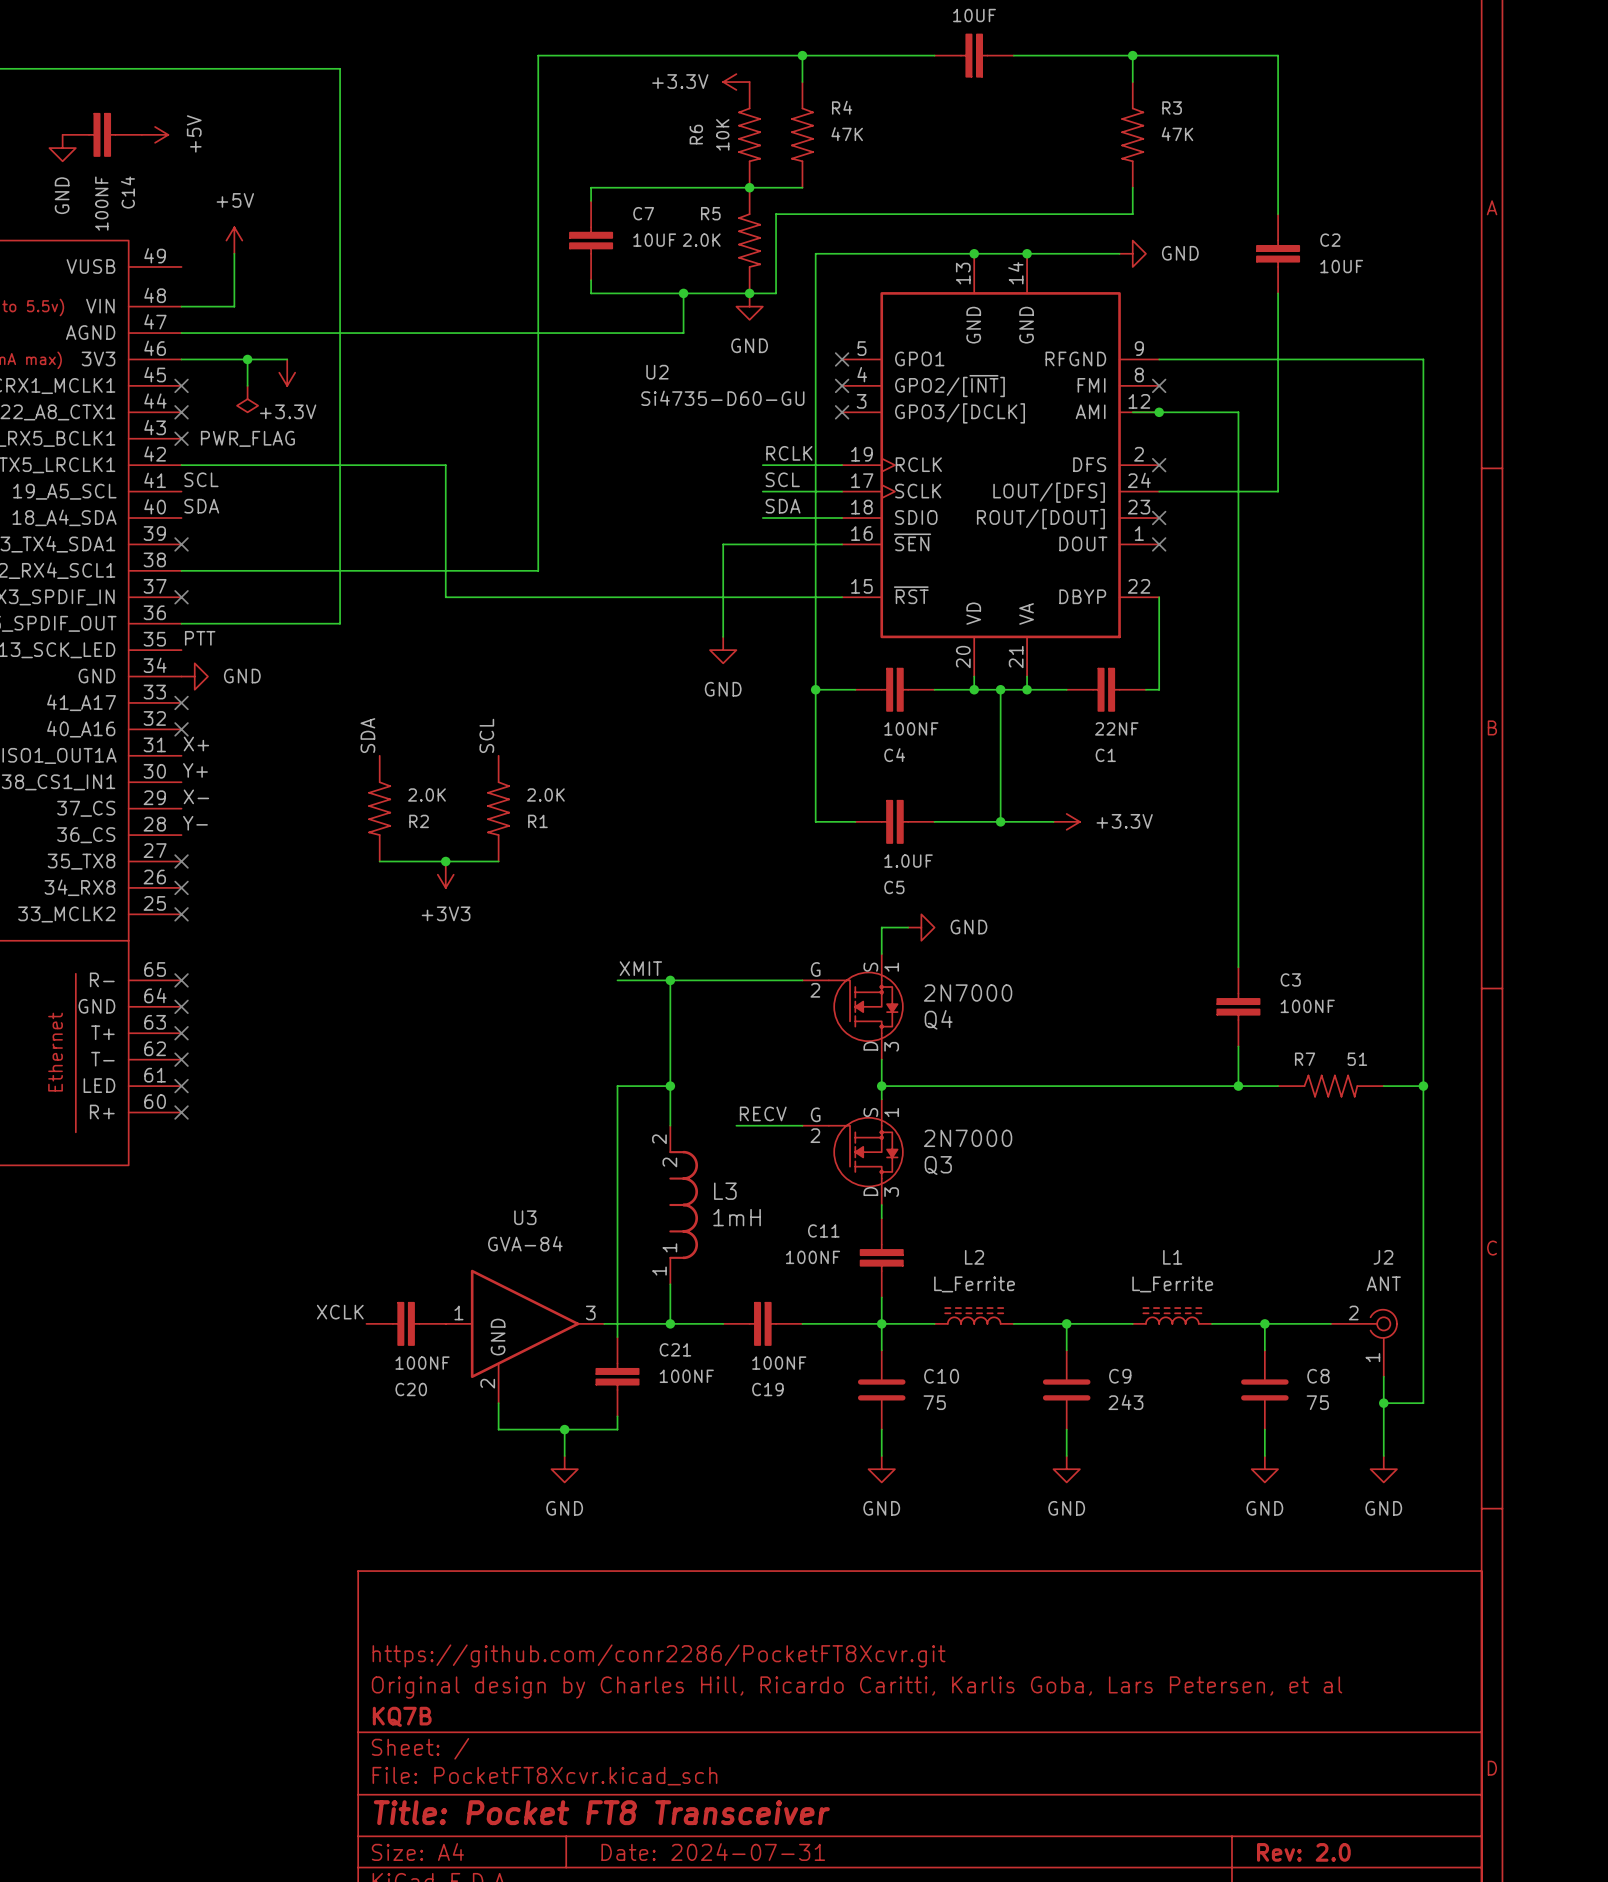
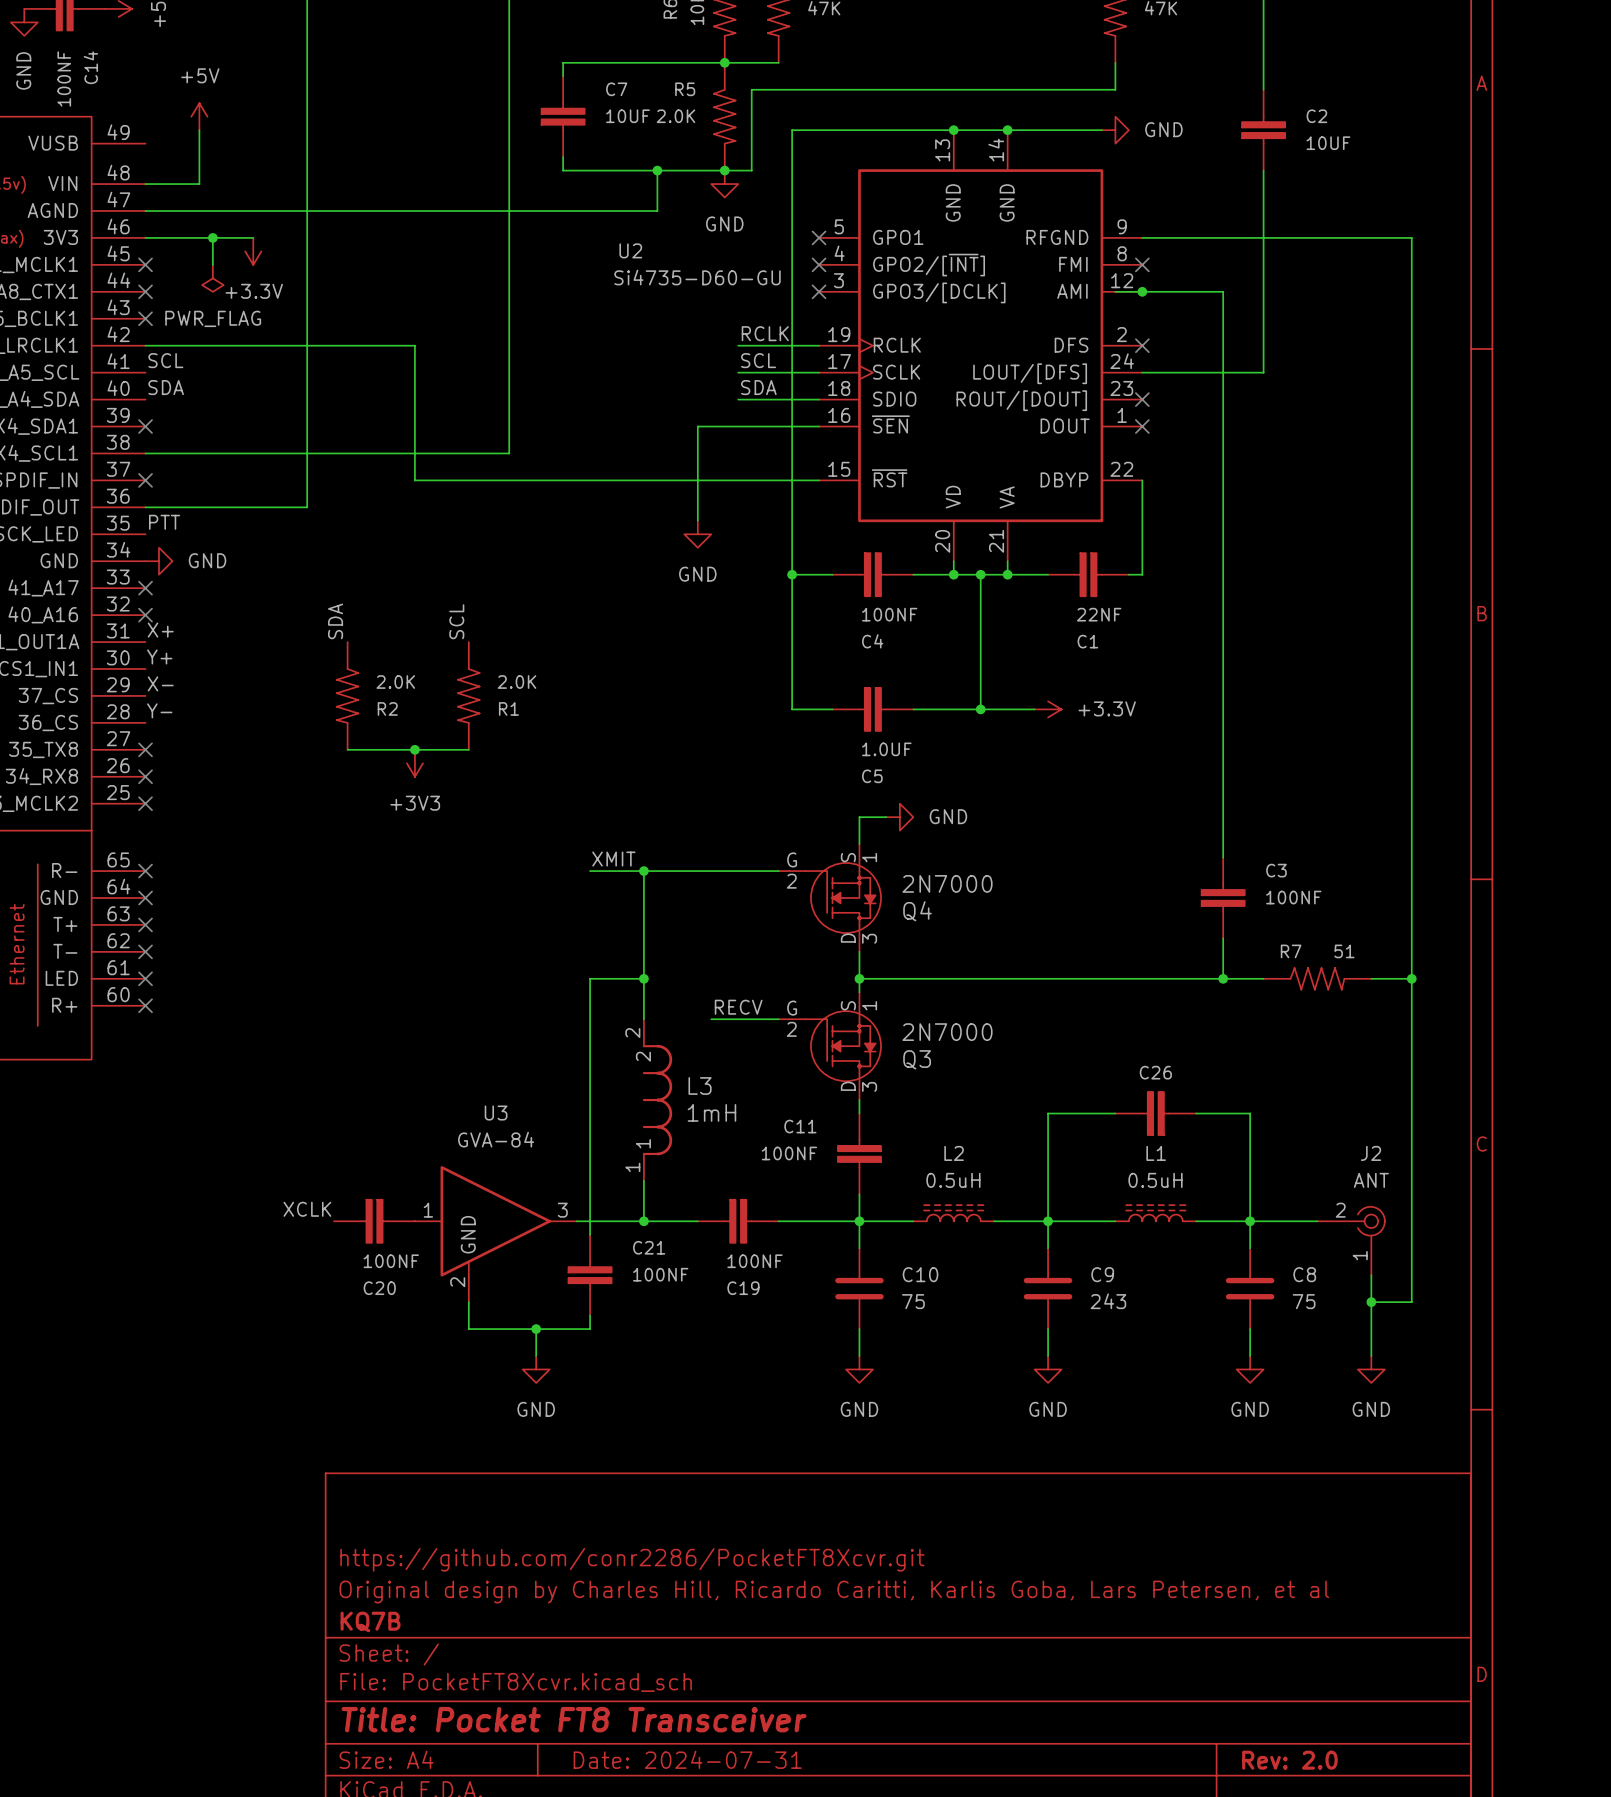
wire: none -> (1115, 1113) (1048, 1113) (1048, 1221)
C26: none -> (1155, 1113)
wire: none -> (1196, 1113) (1250, 1113) (1250, 1221)
L2 value: L_Ferrite (974, 1284) -> 0.5uH (953, 1180)
L1 value: L_Ferrite (1172, 1284) -> 0.5uH (1155, 1180)

